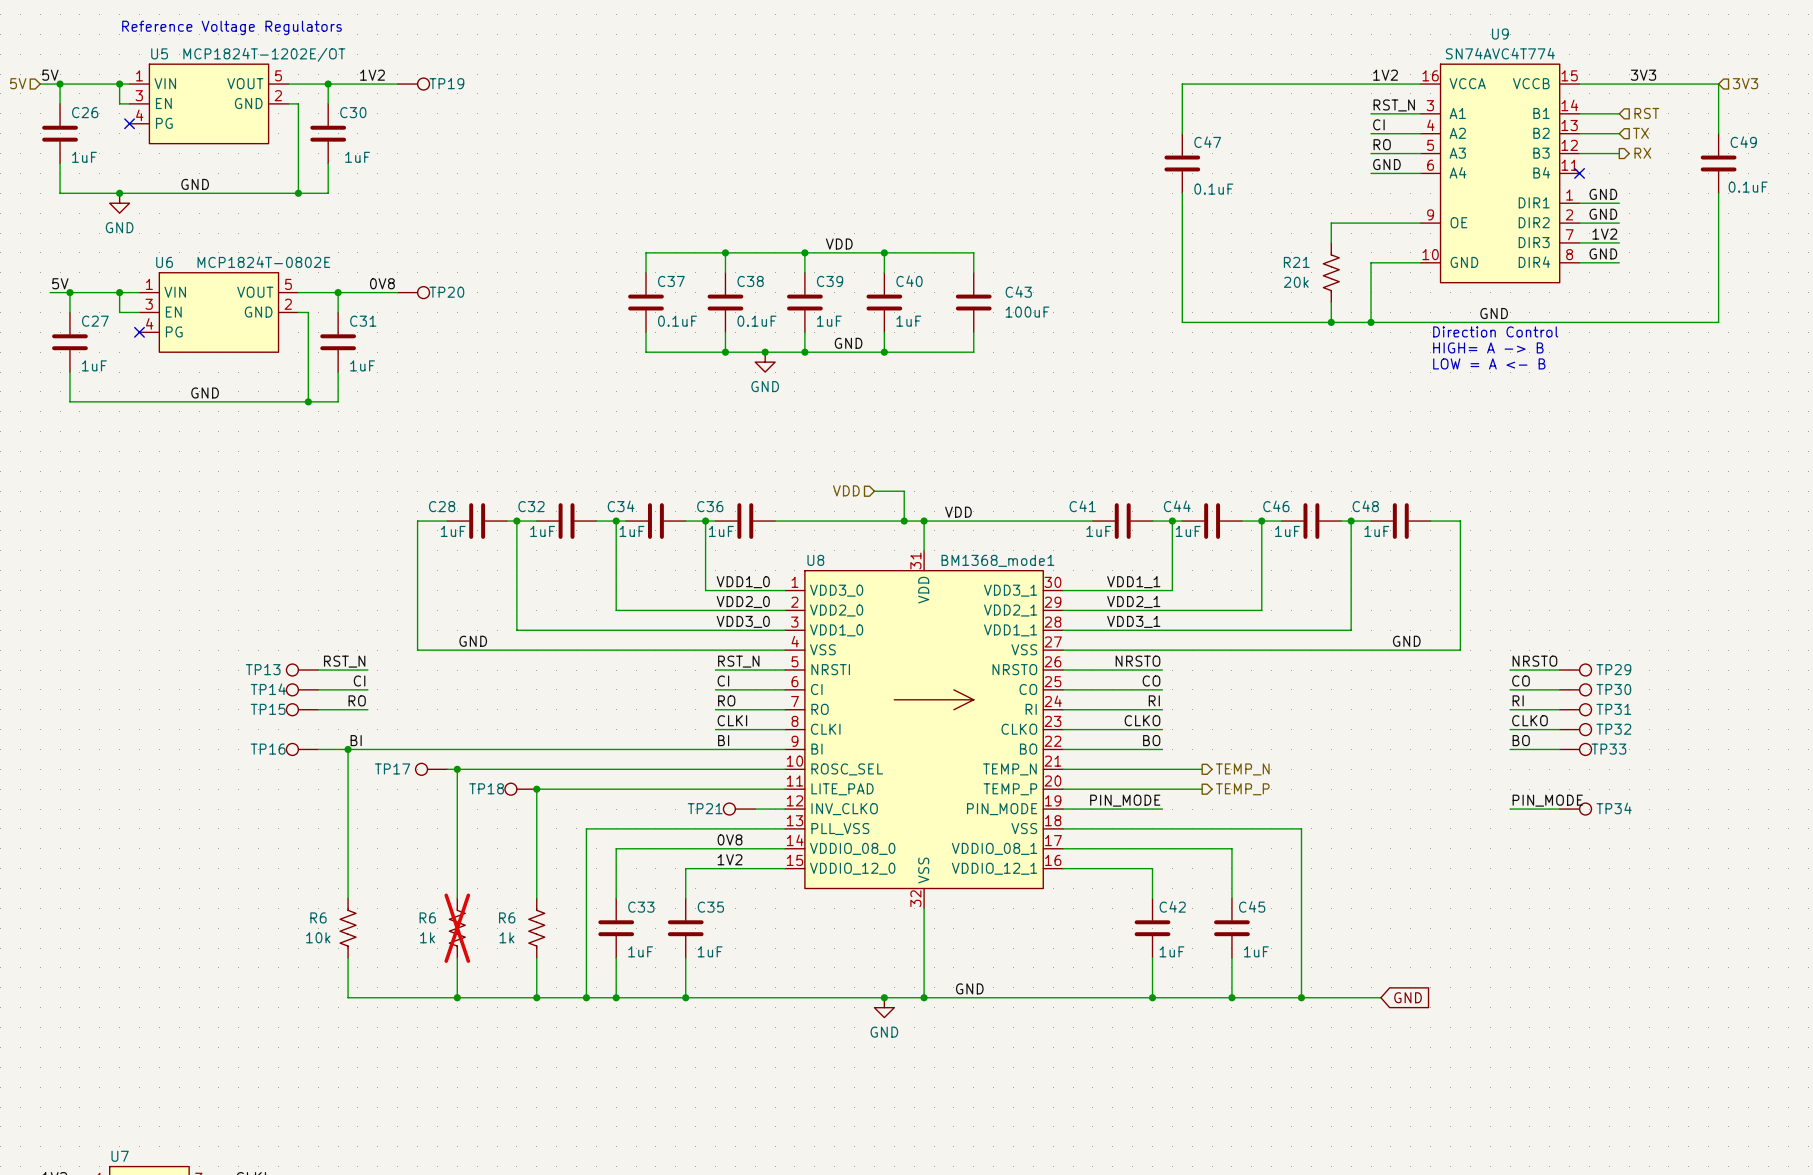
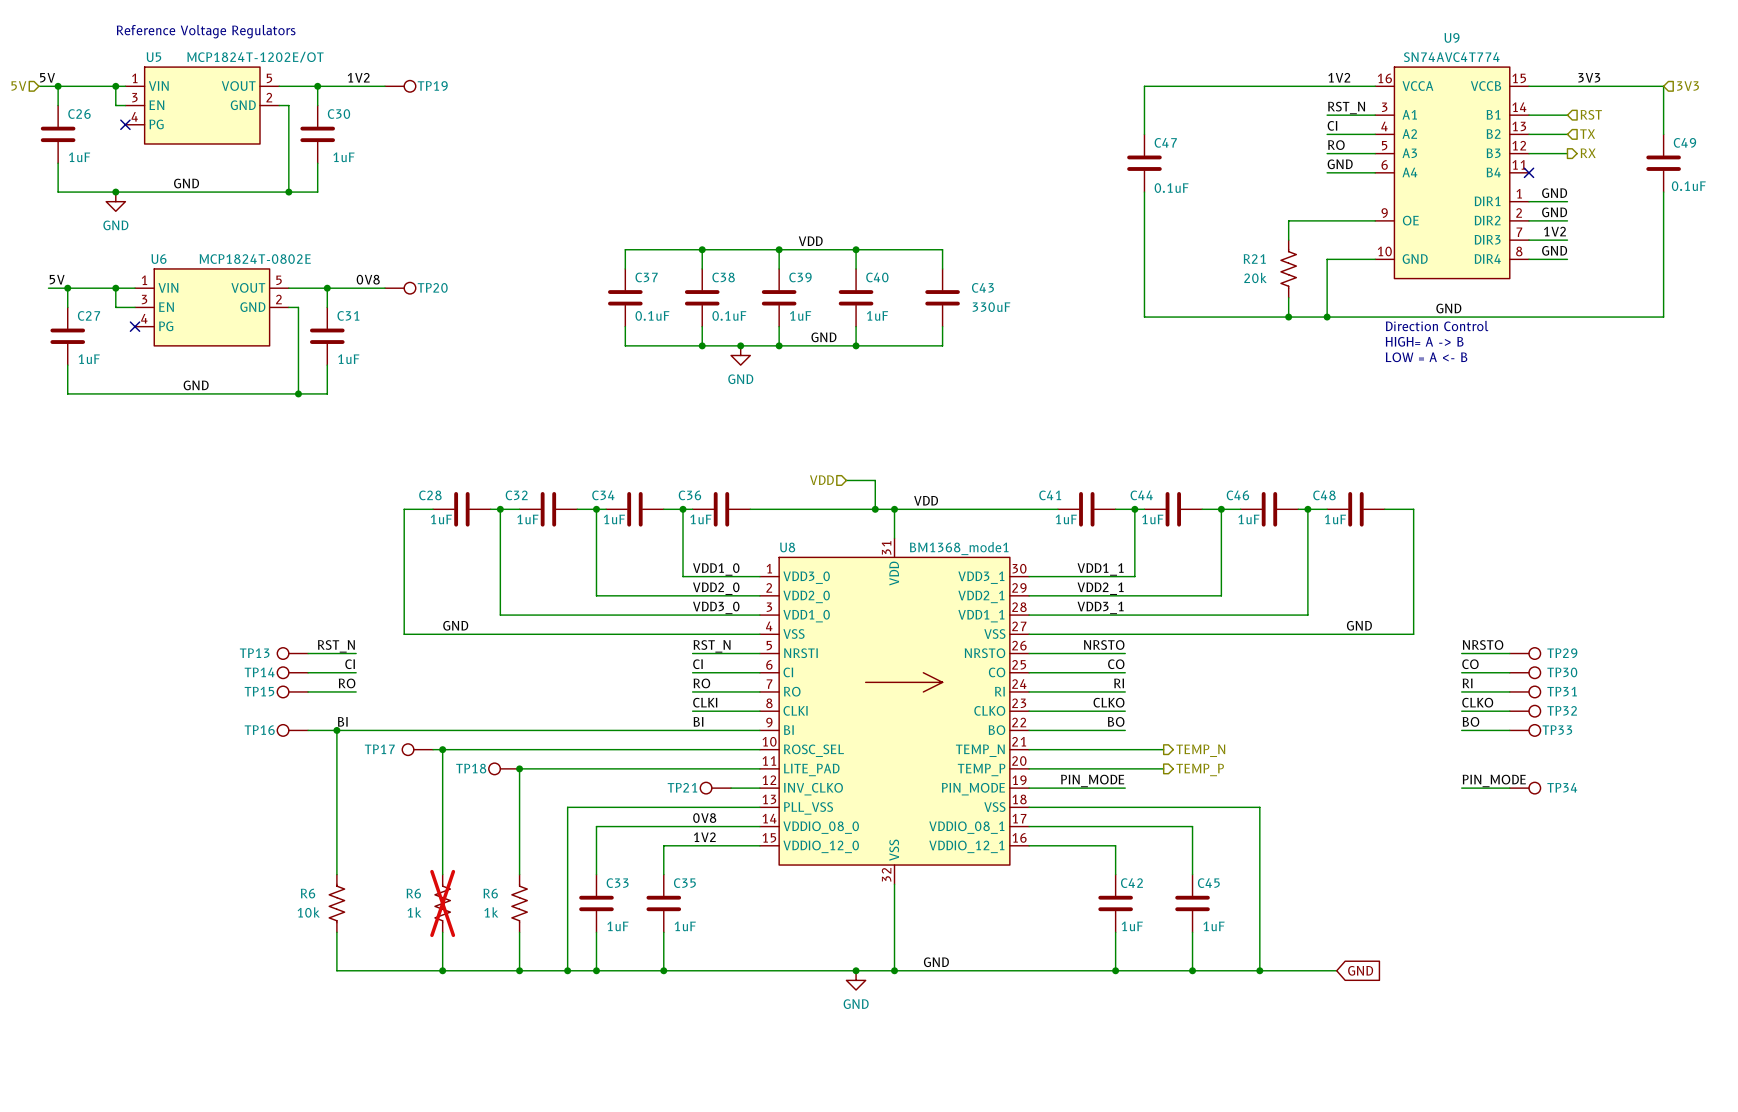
C43 value: 100uF (1027, 312) -> 330uF (991, 307)

